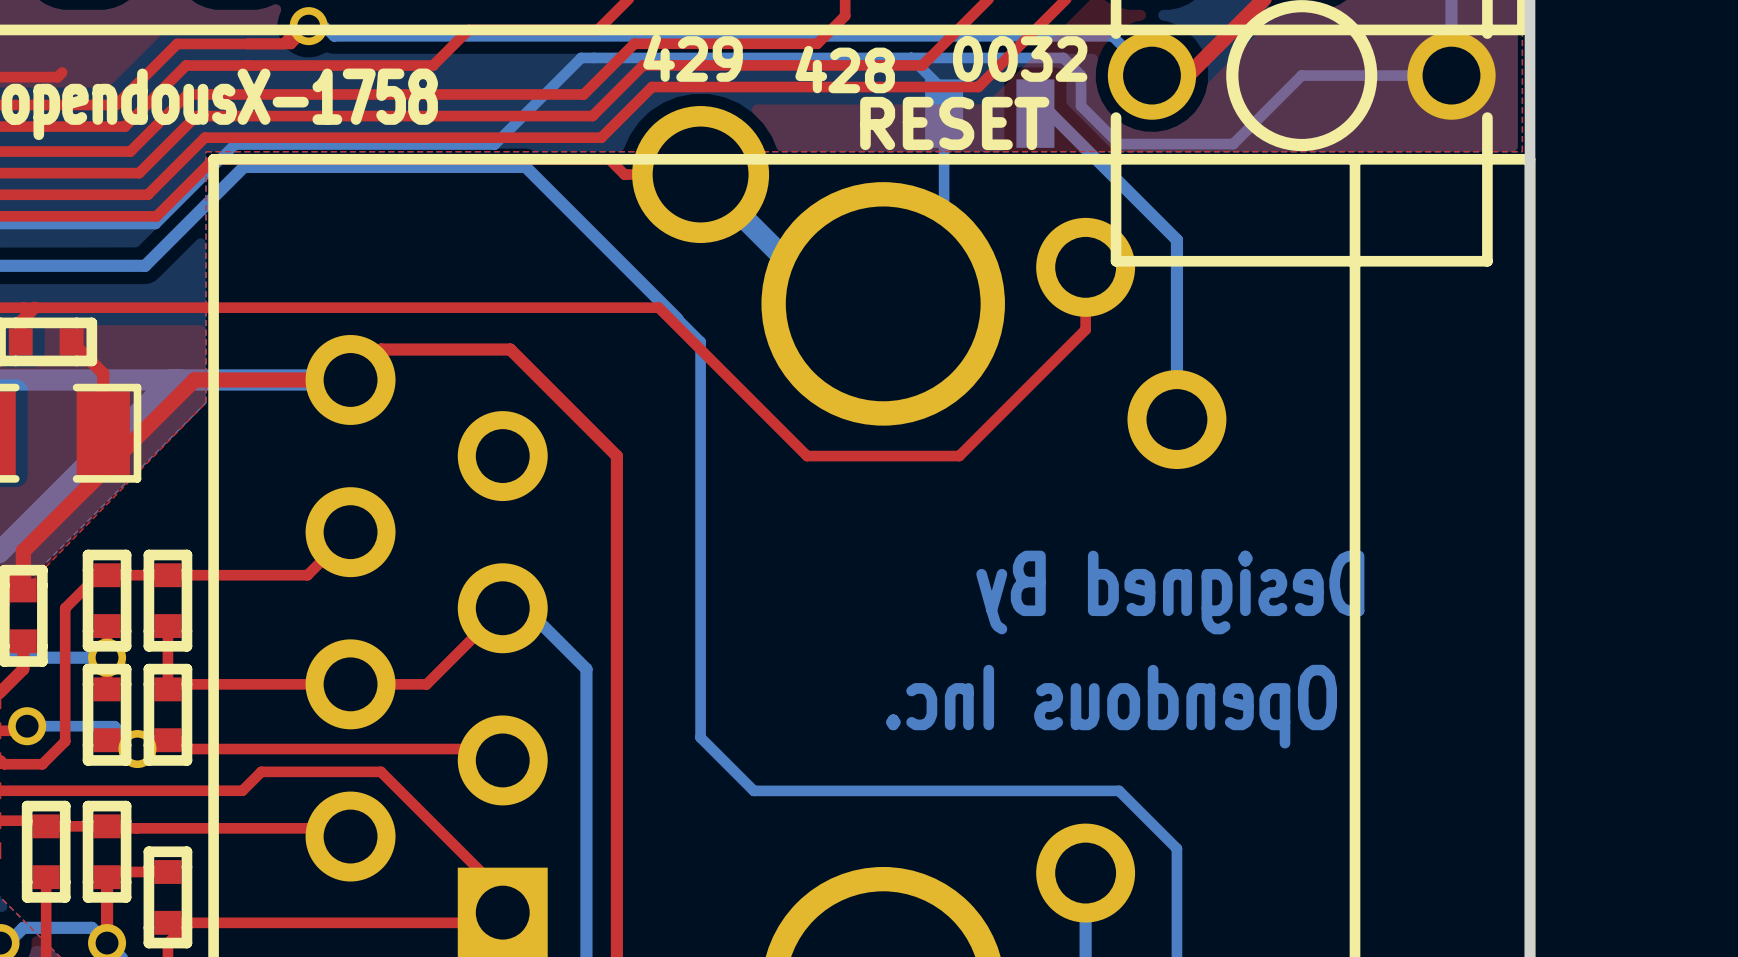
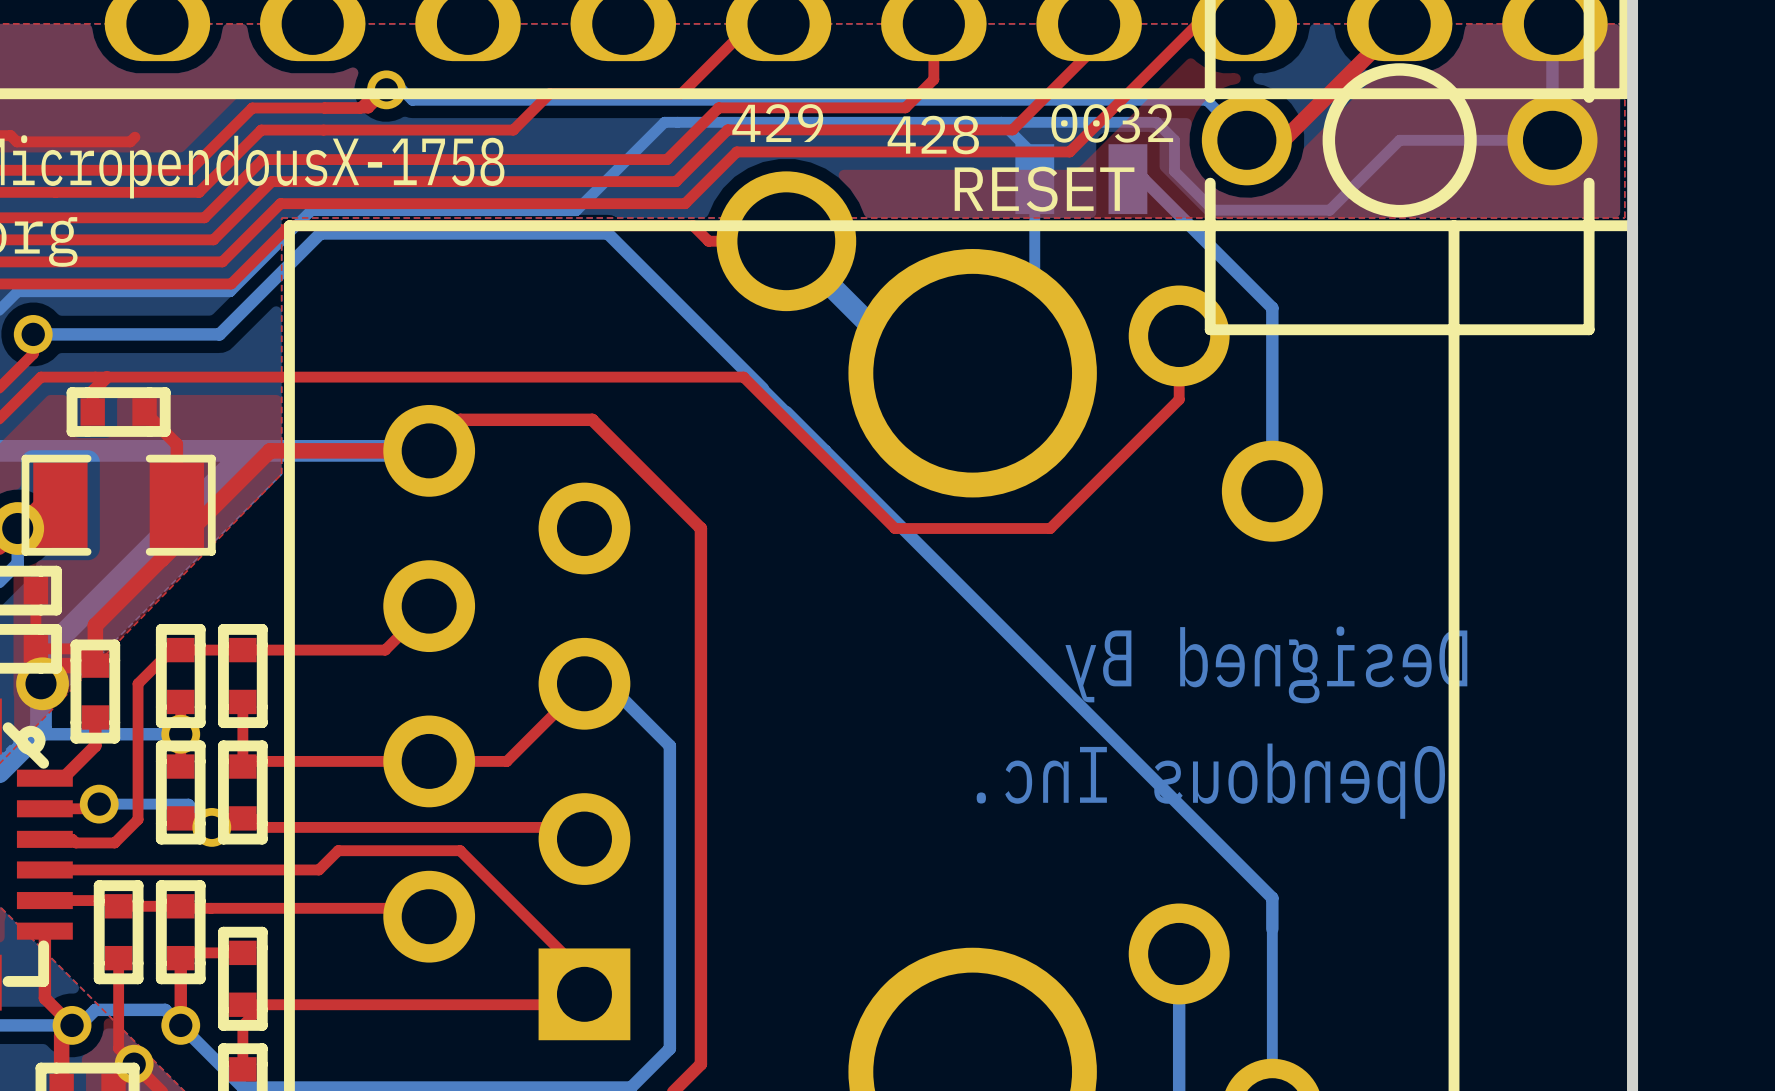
bottom track: (700, 341) (700, 737) (753, 790) (1119, 790) (1176, 848) -> (786, 412) (1272, 898) (1272, 929)

